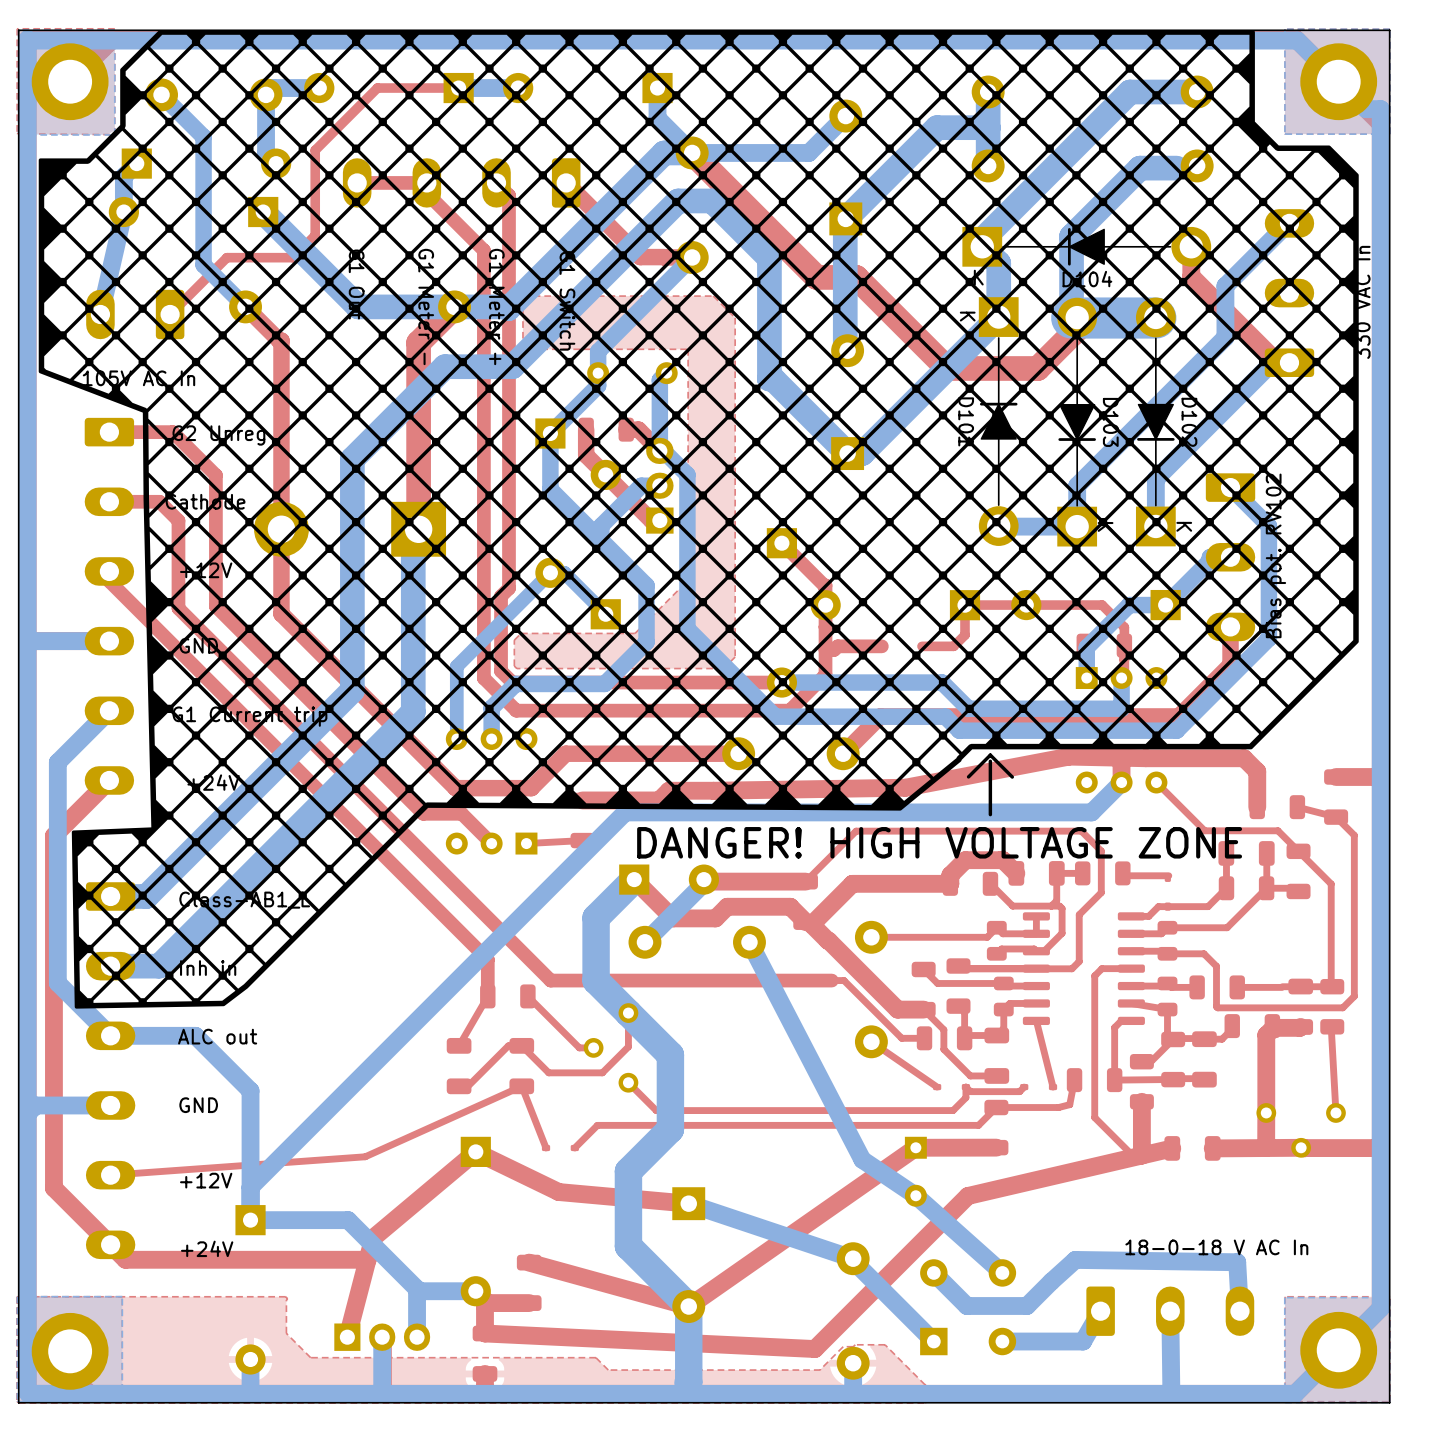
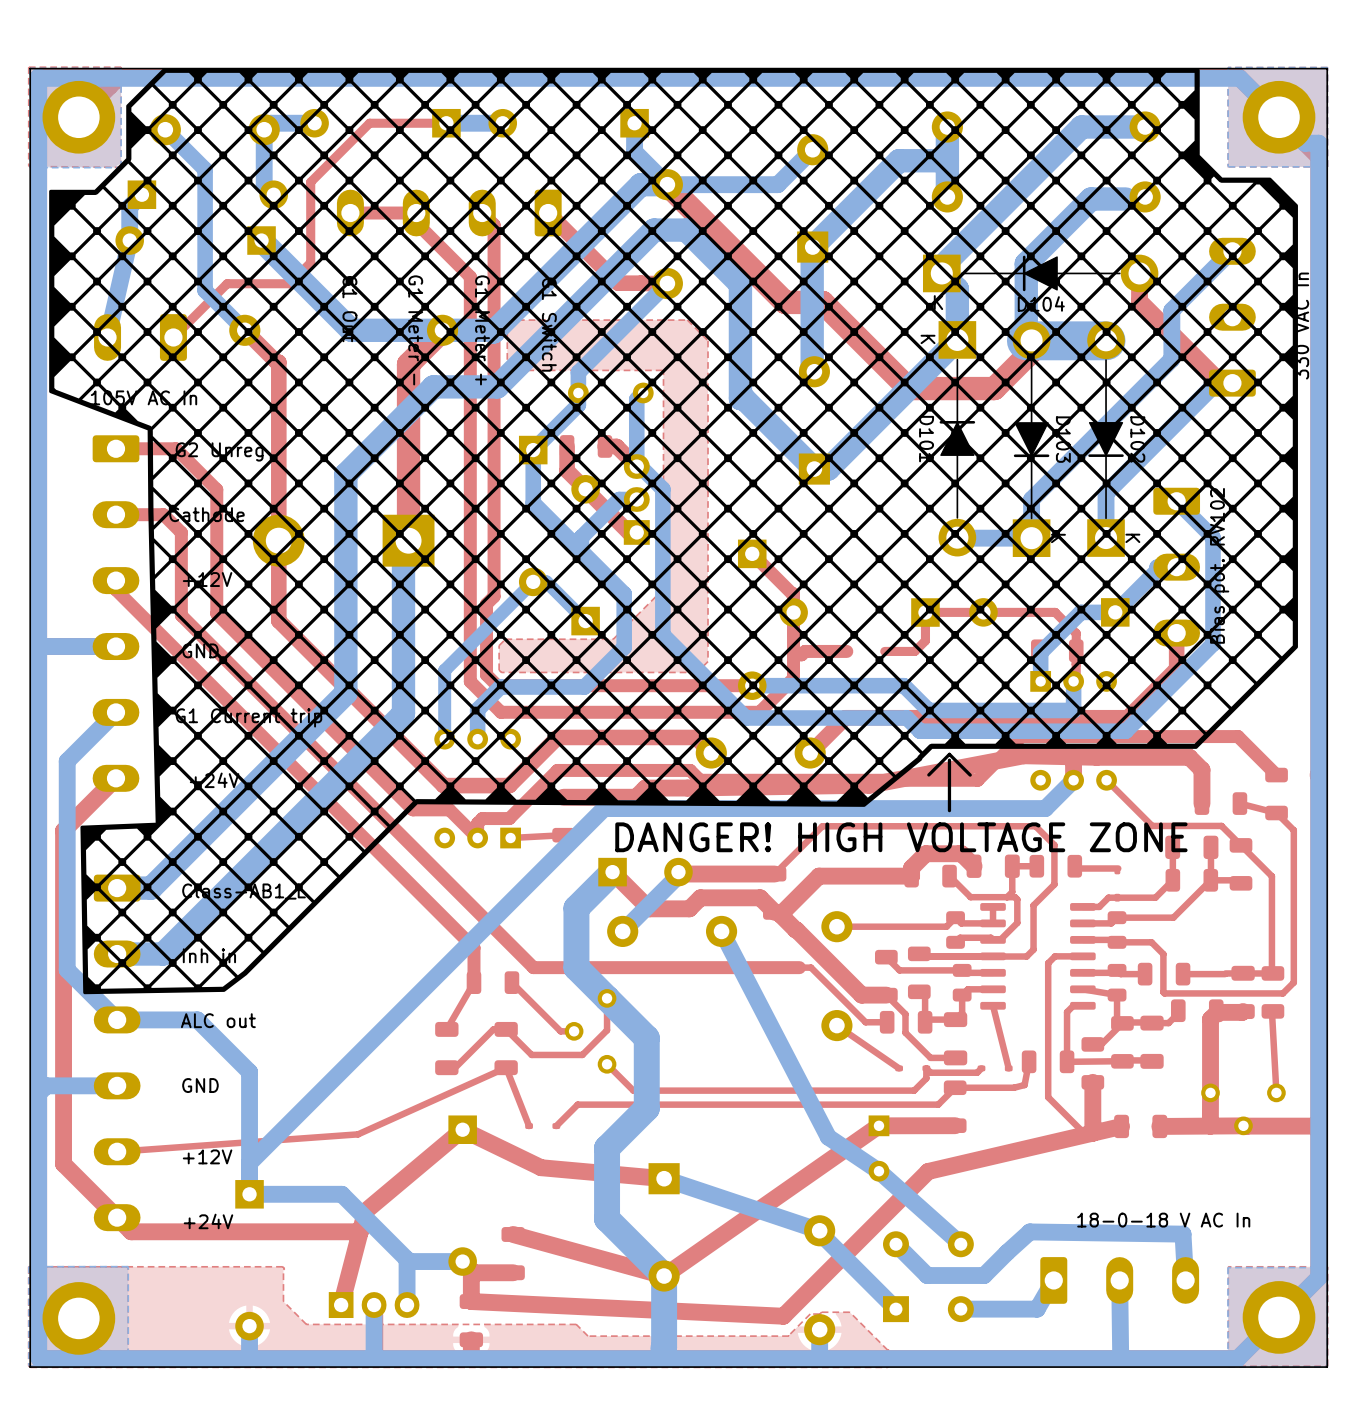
top track: (738, 753) (565, 753) (531, 788) (525, 788) -> (711, 753) (695, 737) (557, 737) (509, 785)
top track: (1380, 777) (1336, 777) -> (477, 838) (477, 823) (482, 818) (509, 818) (557, 770) (690, 770) (700, 780) (977, 780) (1021, 736) (1238, 736) (1276, 775)

